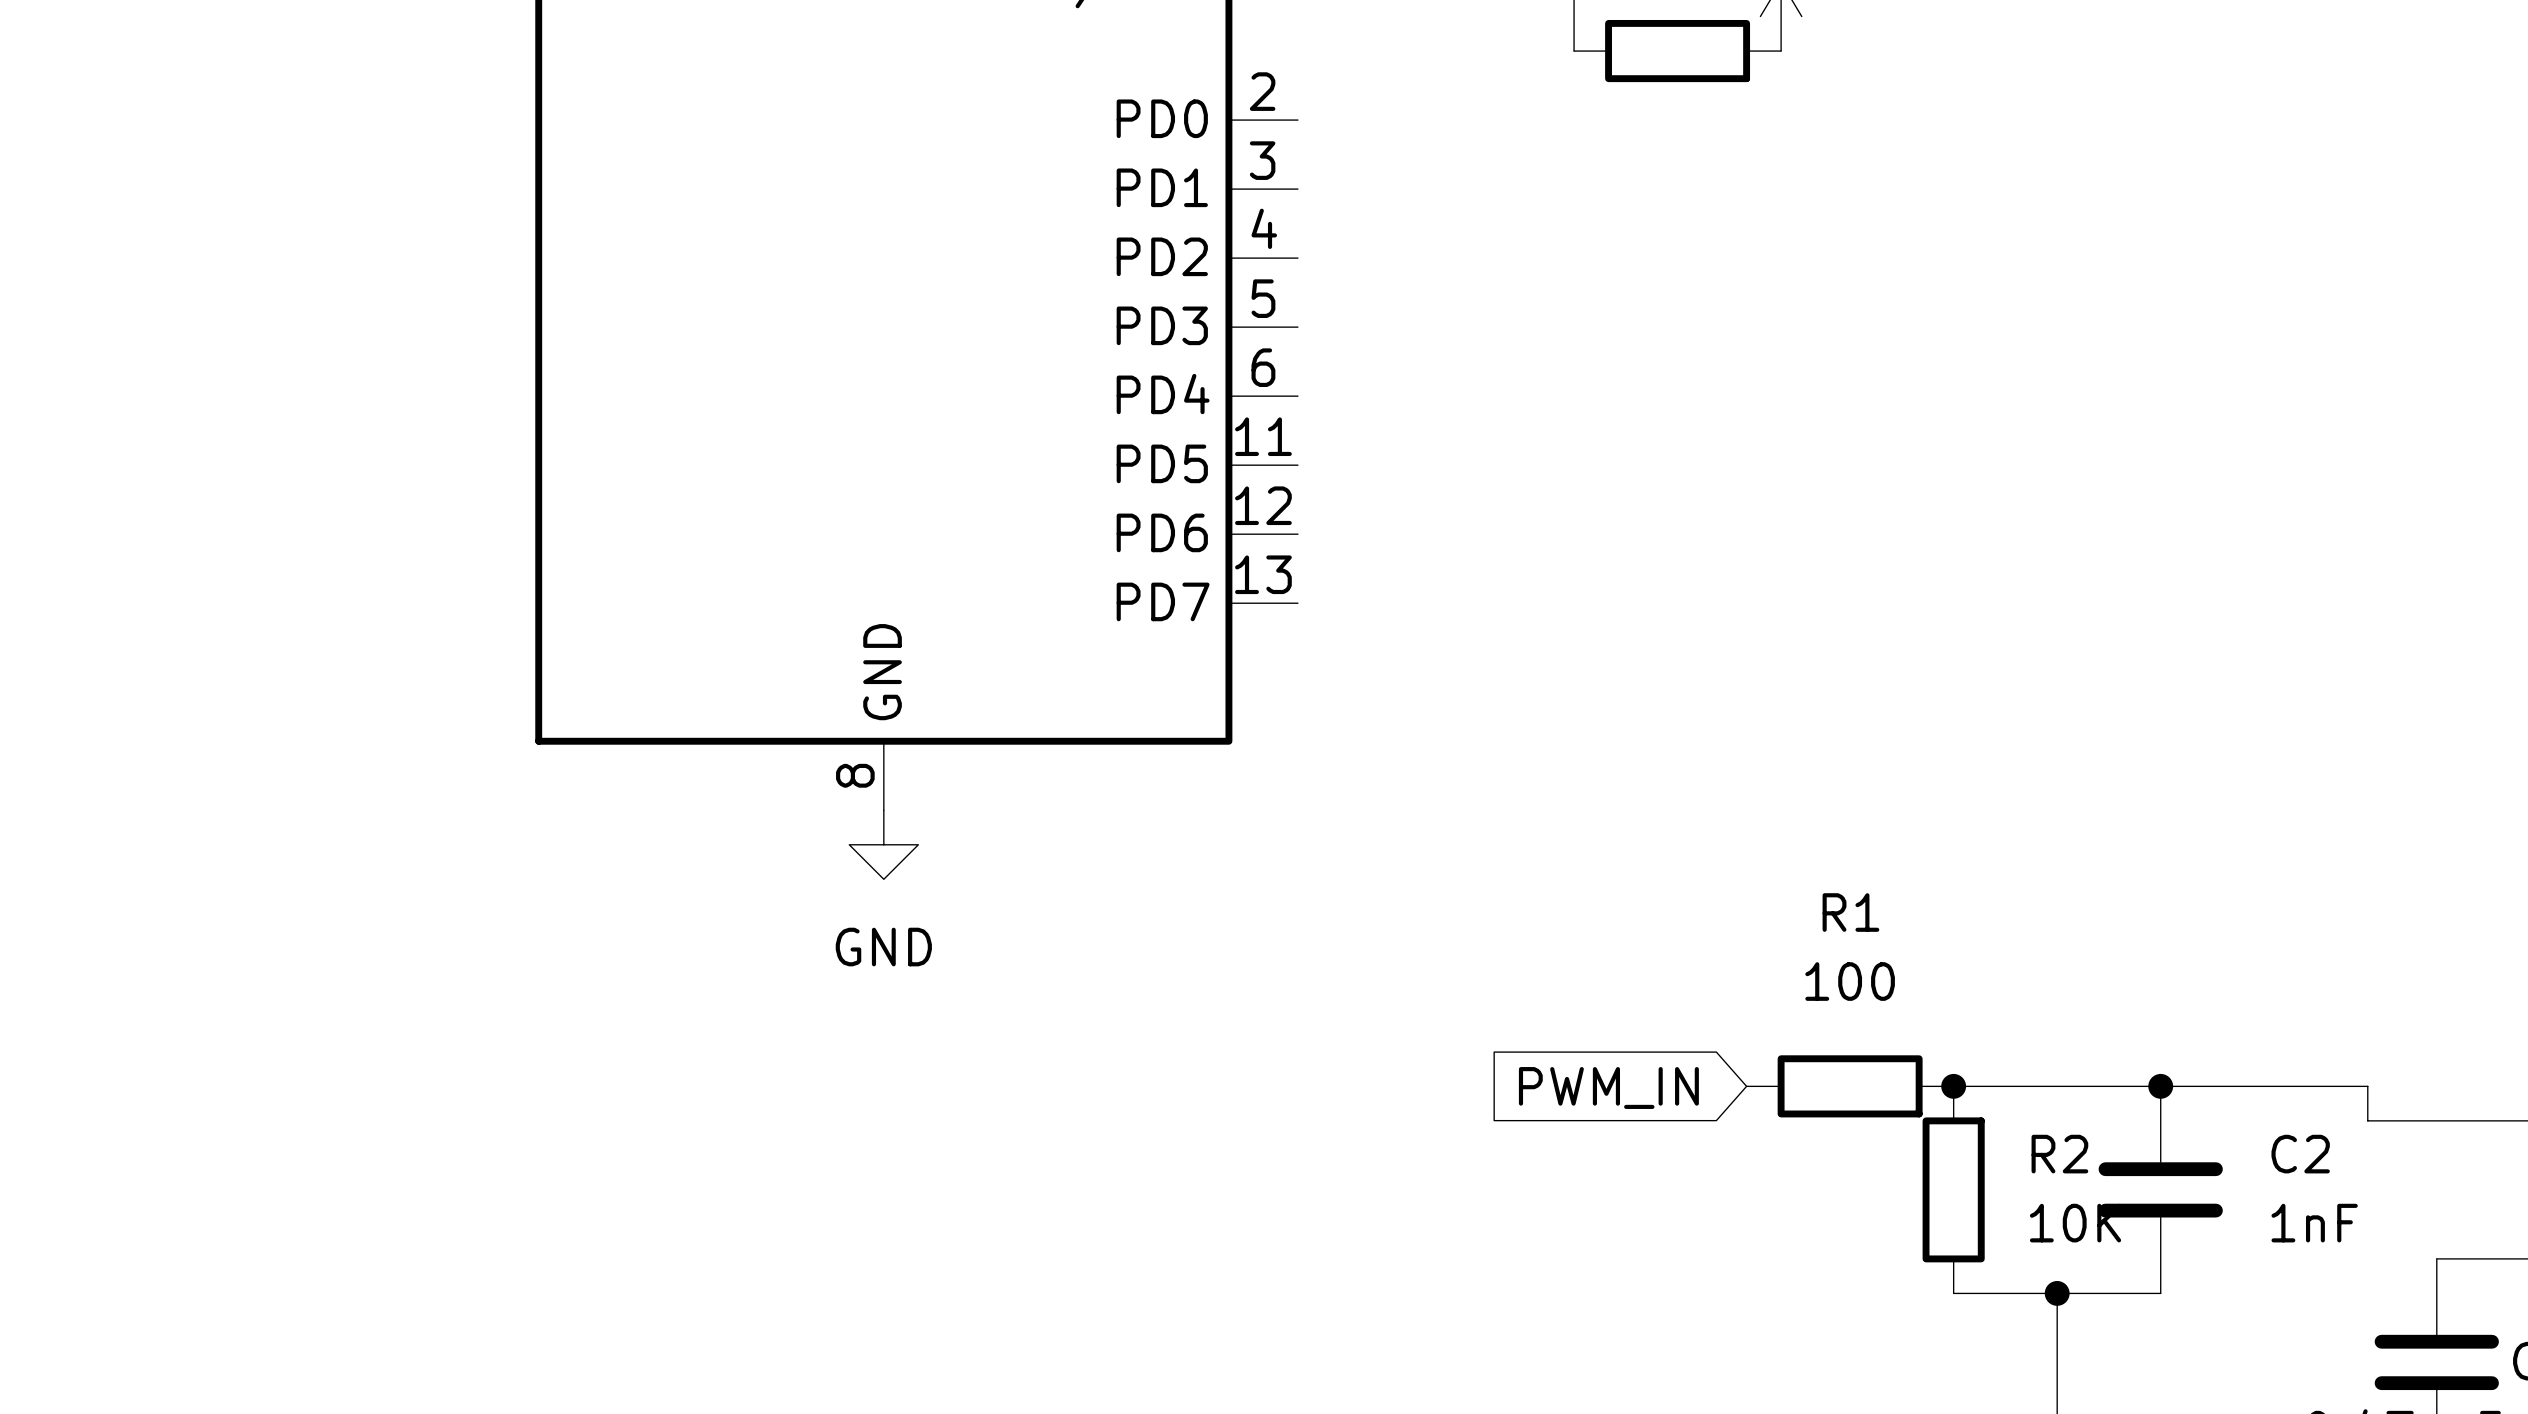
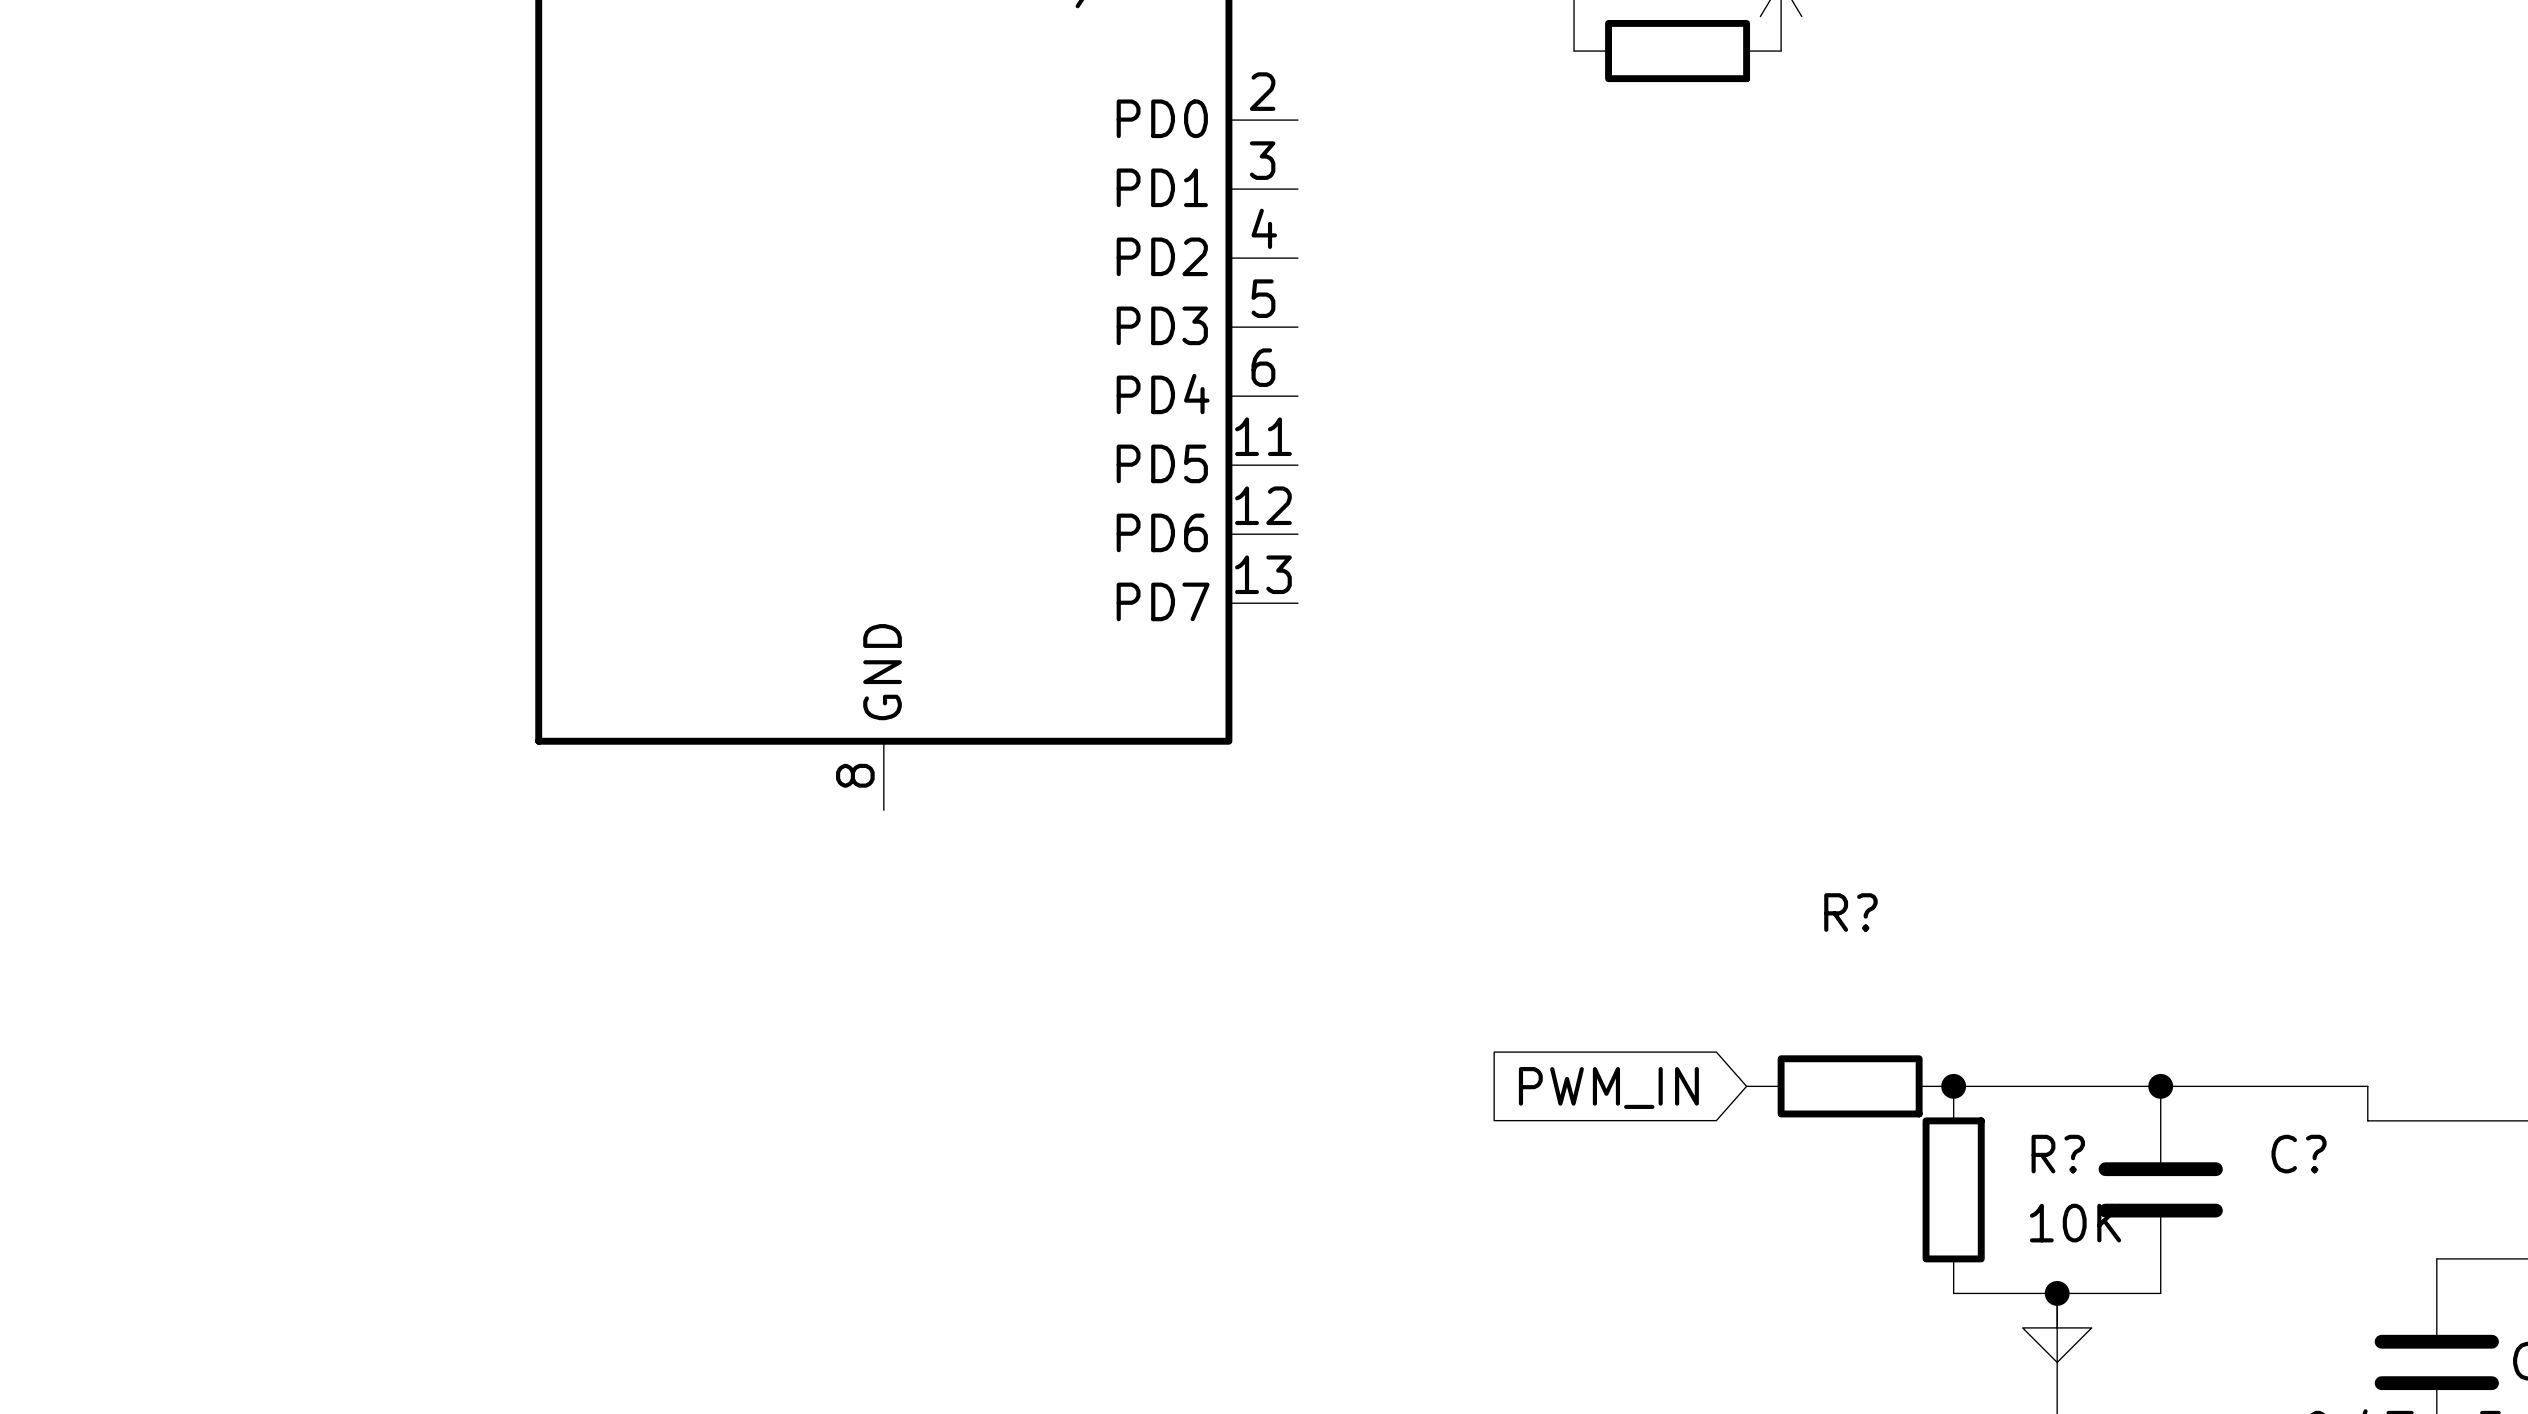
power symbol: GND (883, 844) -> none
R1 name: R1 (1850, 912) -> R? (1850, 912)
R1 value: 100 (1850, 981) -> none
R2 name: R2 (2059, 1154) -> R? (2058, 1154)
C2 name: C2 (2300, 1154) -> C? (2299, 1154)
C2 value: 1nF (2314, 1223) -> none
power symbol: none -> (2057, 1327)

